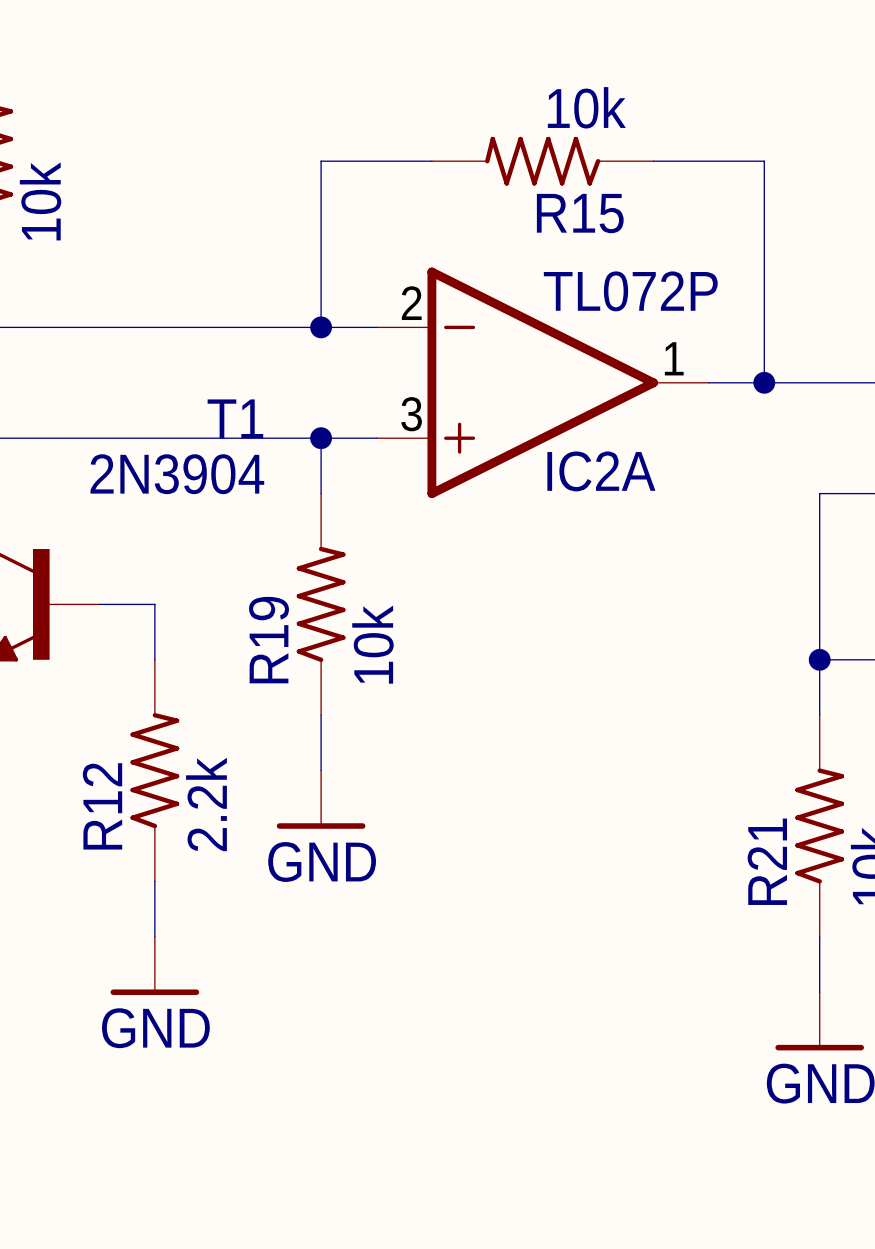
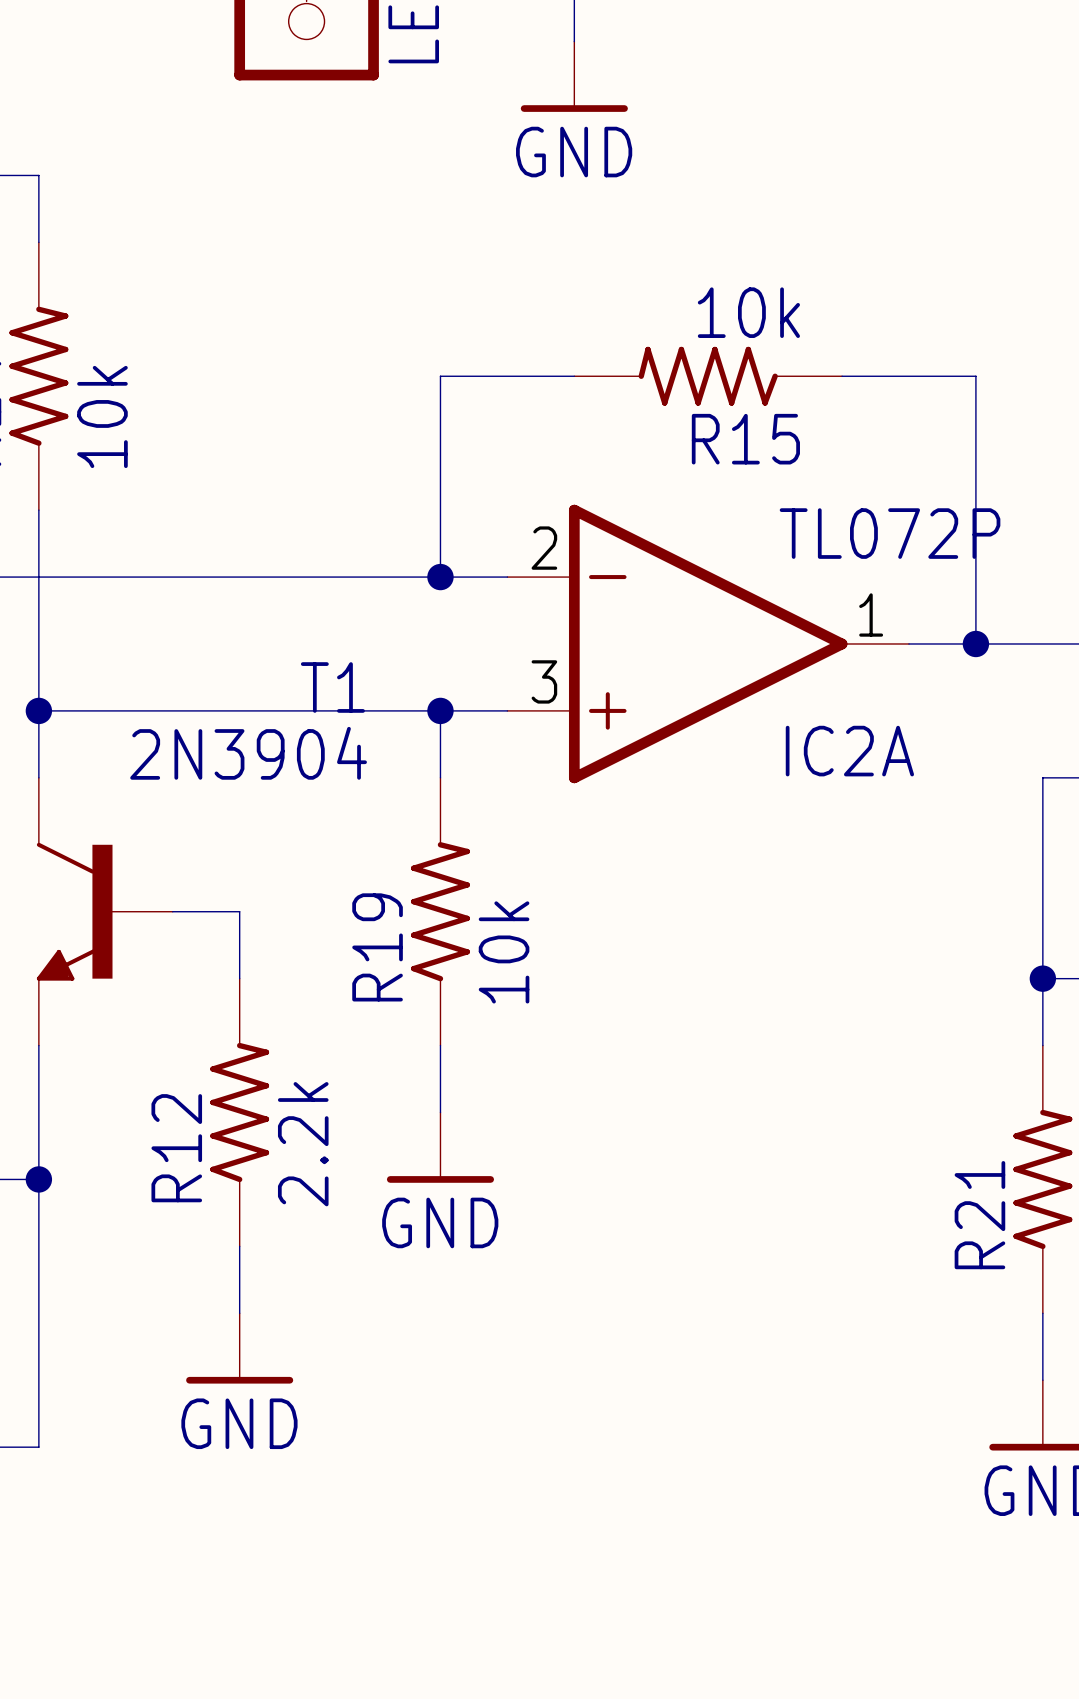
IC2A value position: TL072P (630, 291) -> TL072P (890, 533)
IC2A name position: IC2A (601, 471) -> IC2A (849, 751)

